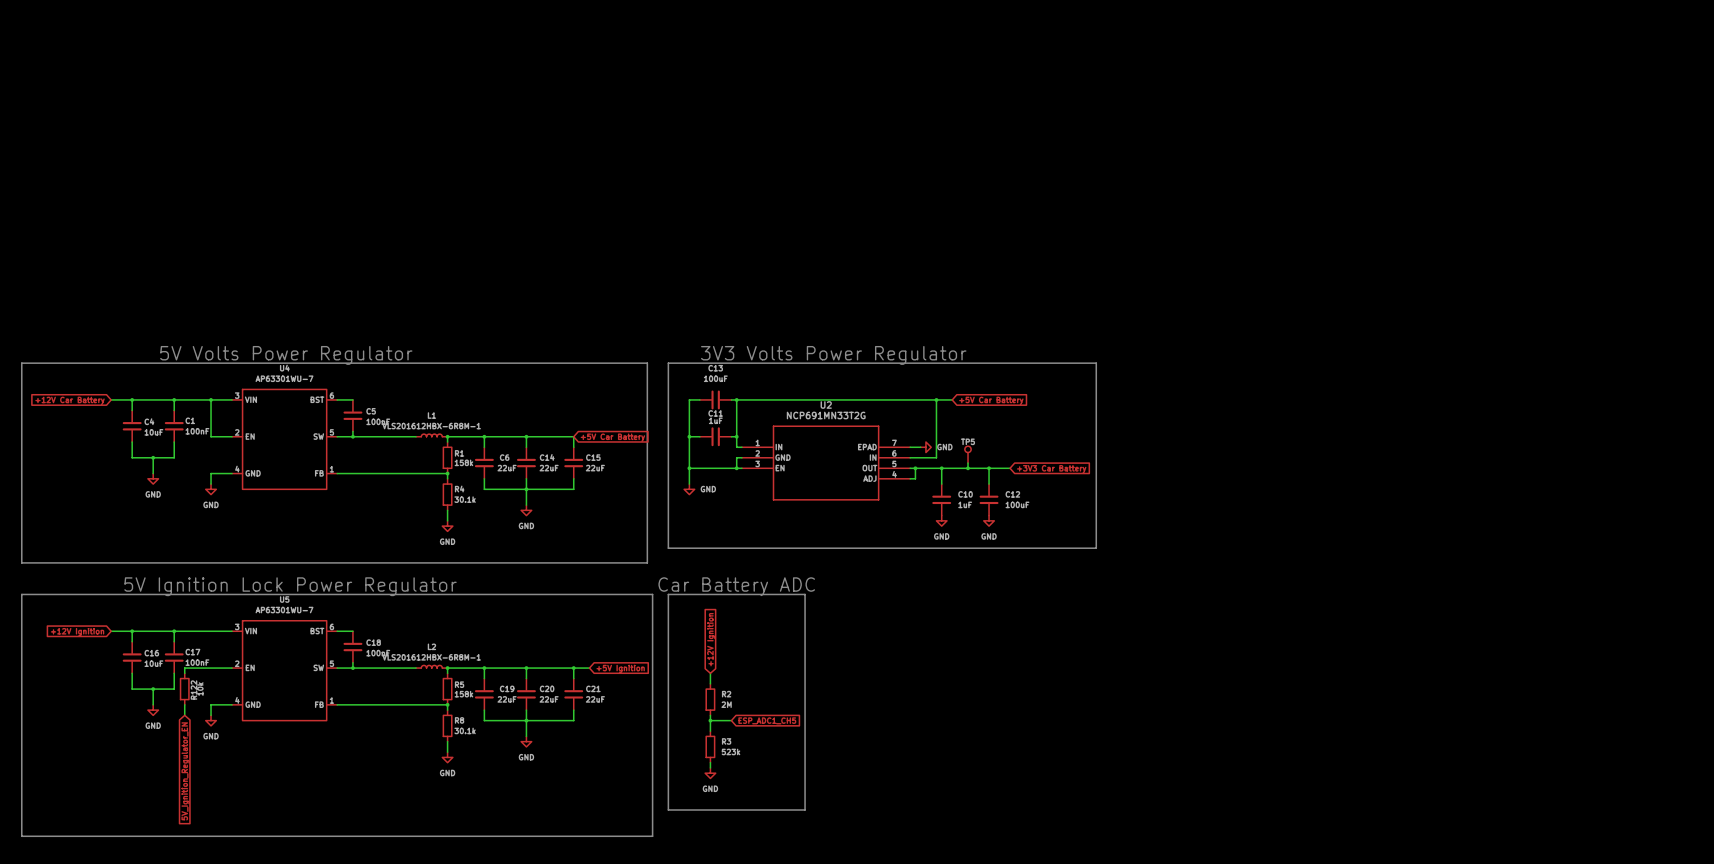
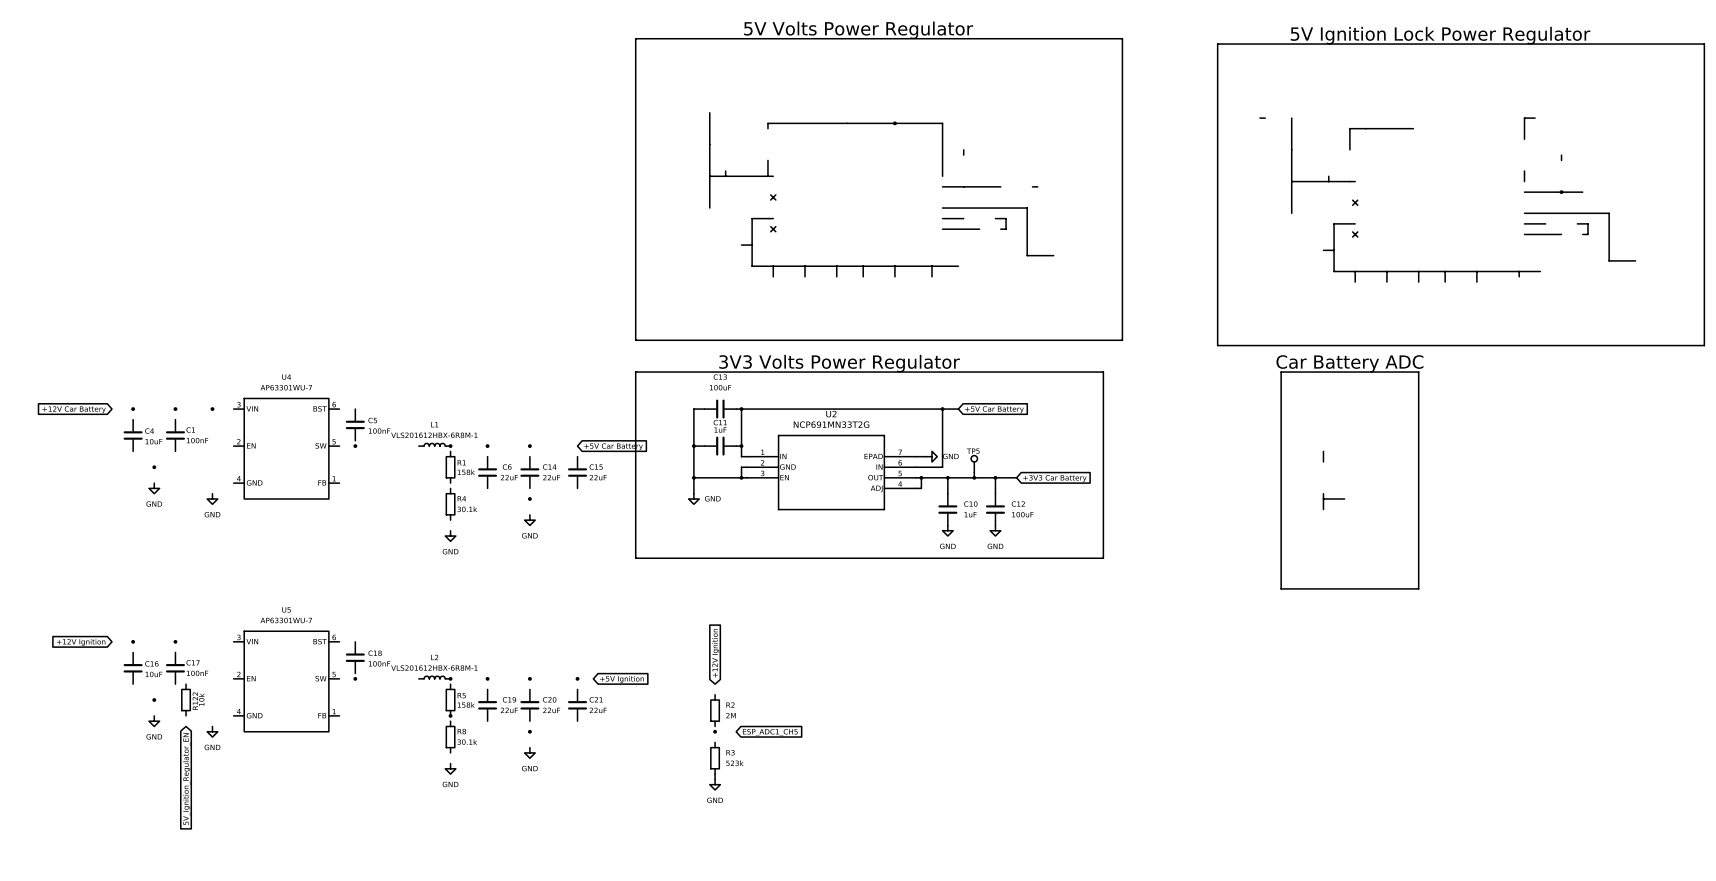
text: none -> 5V Volts Power Regulator (858, 30)
text: none -> 5V Ignition Lock Power Regulator (1440, 35)
line: none -> (635, 38) (1122, 38) (1122, 340) (635, 340) (635, 38)
line: none -> (1217, 44) (1704, 44) (1704, 345) (1217, 345) (1217, 44)
wire: none -> (709, 112) (709, 208)
wire: none -> (1259, 118) (1265, 118)
wire: none -> (1291, 118) (1291, 213)
wire: none -> (1535, 118) (1524, 118) (1524, 139)
junction: none -> (894, 123)
wire: none -> (767, 128) (767, 123) (942, 123) (942, 176)
wire: none -> (1413, 128) (1349, 128) (1349, 149)
wire: none -> (963, 149) (963, 155)
wire: none -> (1561, 155) (1561, 160)
wire: none -> (767, 160) (767, 176)
wire: none -> (725, 170) (725, 176)
wire: none -> (1524, 170) (1524, 181)
wire: none -> (709, 176) (773, 176)
wire: none -> (1328, 176) (1328, 181)
wire: none -> (1291, 181) (1355, 181)
wire: none -> (942, 186) (1000, 186)
wire: none -> (1032, 186) (1037, 186)
wire: none -> (1524, 192) (1582, 192)
junction: none -> (1561, 192)
no-connect mark: none -> (773, 197)
no-connect mark: none -> (1355, 202)
wire: none -> (942, 208) (1027, 208) (1027, 255) (1053, 255)
wire: none -> (1524, 213) (1609, 213) (1609, 260) (1635, 260)
wire: none -> (773, 218) (752, 218) (752, 266) (958, 266)
wire: none -> (942, 218) (963, 218)
wire: none -> (995, 218) (1006, 218) (1006, 229) (1000, 229)
wire: none -> (1355, 223) (1334, 223) (1334, 271) (1540, 271)
wire: none -> (1524, 223) (1545, 223)
wire: none -> (1577, 223) (1587, 223) (1587, 234) (1582, 234)
no-connect mark: none -> (773, 229)
wire: none -> (942, 229) (979, 229)
no-connect mark: none -> (1355, 234)
wire: none -> (1524, 234) (1561, 234)
wire: none -> (741, 245) (752, 245)
wire: none -> (1323, 250) (1334, 250)
wire: none -> (773, 266) (773, 276)
wire: none -> (805, 266) (805, 276)
wire: none -> (836, 266) (836, 276)
wire: none -> (863, 266) (863, 276)
wire: none -> (894, 266) (894, 276)
wire: none -> (931, 266) (931, 276)
wire: none -> (1355, 271) (1355, 282)
wire: none -> (1386, 271) (1386, 282)
wire: none -> (1418, 271) (1418, 282)
wire: none -> (1445, 271) (1445, 282)
wire: none -> (1476, 271) (1476, 282)
wire: none -> (1519, 271) (1519, 276)
text: 5V Volts Power Regulator (286, 355) -> none
text: none -> Car Battery ADC (1349, 363)
line: (631, 363) (21, 363) (21, 562) (647, 562) (647, 363) -> (672, 372) (651, 372)
line: (668, 363) (668, 548) -> (635, 372) (635, 558) (672, 558)
line: none -> (1281, 372) (1418, 372) (1418, 588) (1281, 588) (1281, 372)
wire: (111, 399) (232, 399) -> none
wire: (132, 399) (132, 410) -> none
wire: (174, 399) (174, 410) -> none
wire: (211, 399) (211, 436) (232, 436) -> none
wire: (337, 399) (352, 399) -> none
wire: (352, 431) (352, 436) -> none
wire: (337, 436) (416, 436) -> none
wire: (484, 436) (484, 447) -> none
wire: (526, 436) (526, 447) -> none
wire: (132, 442) (132, 457) (174, 457) (174, 442) -> none
wire: (447, 442) (447, 436) (573, 436) (573, 447) -> none
wire: none -> (1323, 451) (1323, 461)
wire: (153, 457) (153, 473) -> none
wire: (232, 473) (211, 473) (211, 484) -> none
wire: (337, 473) (447, 473) (447, 478) -> none
junction: (447, 473) -> none
wire: (484, 478) (484, 489) (573, 489) (573, 478) -> none
wire: (526, 478) (526, 505) -> none
wire: none -> (1323, 493) (1323, 509)
wire: none -> (1323, 498) (1344, 498)
wire: (447, 510) (447, 520) -> none
text: 5V Ignition Lock Power Regulator (290, 586) -> none
text: Car Battery ADC (736, 586) -> none
line: (21, 594) (652, 594) (652, 836) (21, 836) (21, 594) -> none
line: (668, 594) (805, 594) (805, 809) (668, 809) (668, 594) -> none
wire: (111, 631) (232, 631) -> none
wire: (132, 631) (132, 641) -> none
wire: (174, 631) (174, 641) -> none
wire: (337, 631) (352, 631) -> none
wire: (352, 662) (352, 668) -> none
wire: (232, 668) (184, 668) (184, 673) -> none
wire: (337, 668) (416, 668) -> none
wire: (484, 668) (484, 678) -> none
wire: (526, 668) (526, 678) -> none
wire: (573, 668) (573, 678) -> none
wire: (589, 668) (447, 668) (447, 673) -> none
wire: (132, 673) (132, 689) (174, 689) (174, 673) -> none
wire: (710, 673) (710, 683) -> none
wire: (153, 689) (153, 704) -> none
wire: (184, 704) (184, 715) -> none
wire: (232, 704) (211, 704) (211, 715) -> none
wire: (337, 704) (447, 704) (447, 710) -> none
wire: (484, 710) (484, 720) (573, 720) (573, 710) -> none
wire: (526, 710) (526, 736) -> none
wire: (710, 715) (710, 731) -> none
wire: (710, 720) (731, 720) -> none
wire: (447, 741) (447, 752) -> none

